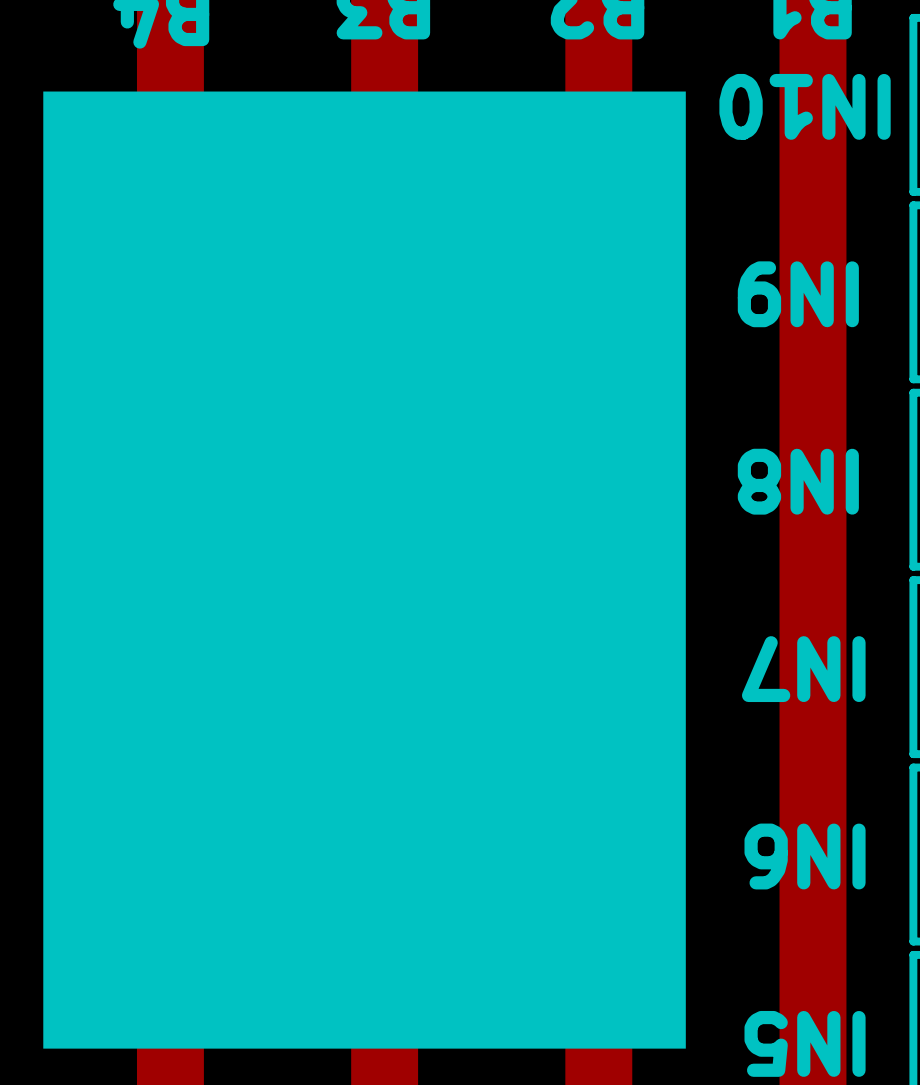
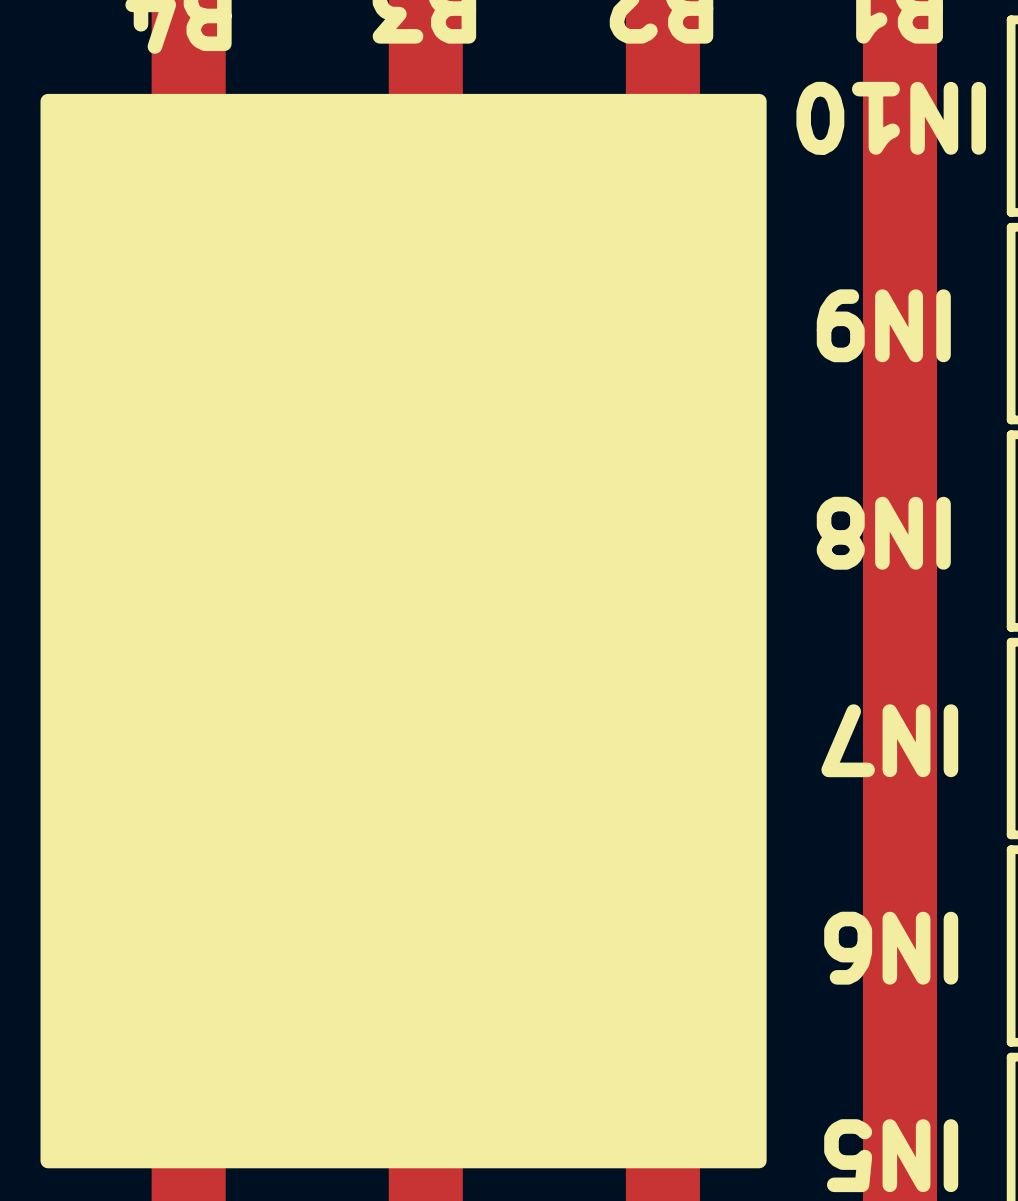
drawing shape: [43, 91, 686, 1049] -> [40, 93, 767, 1169]

